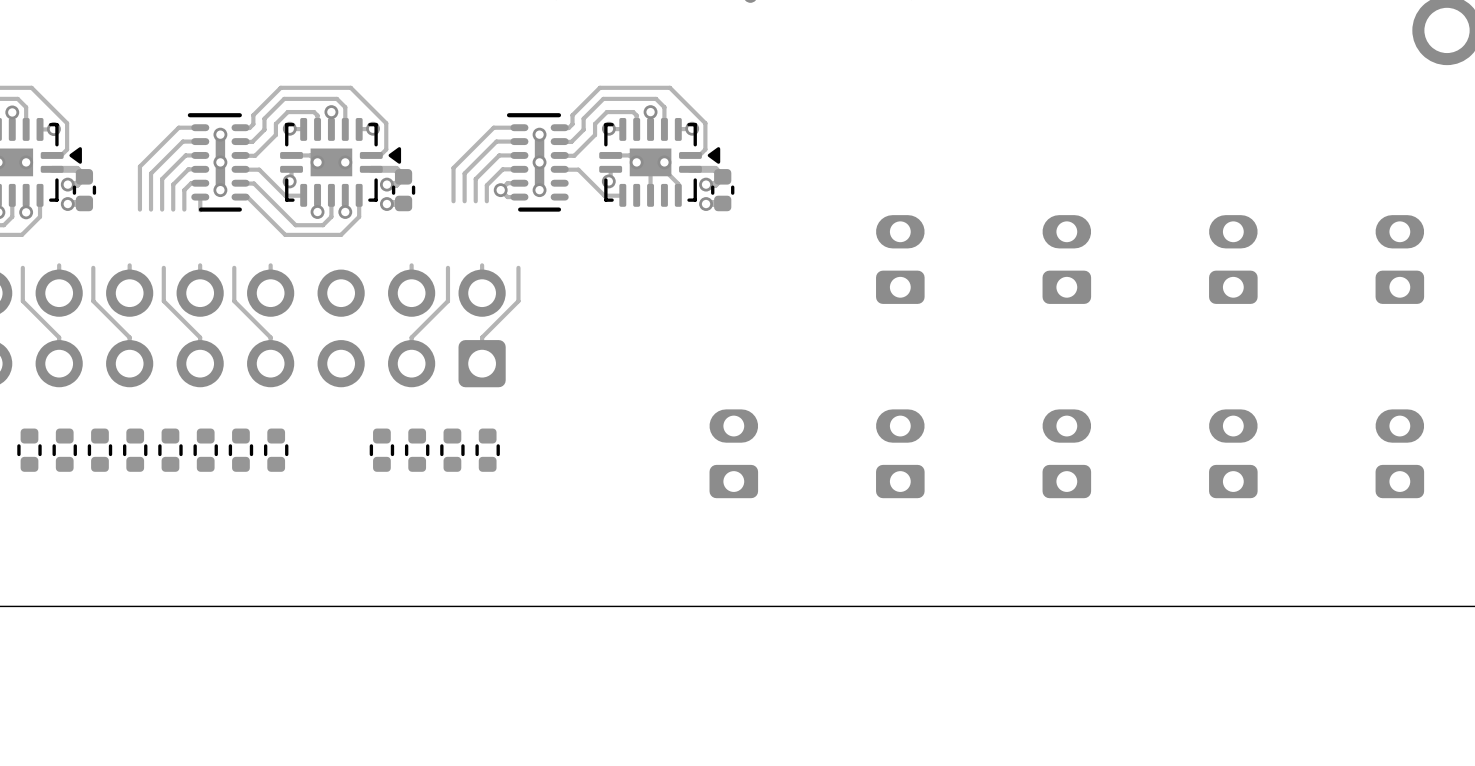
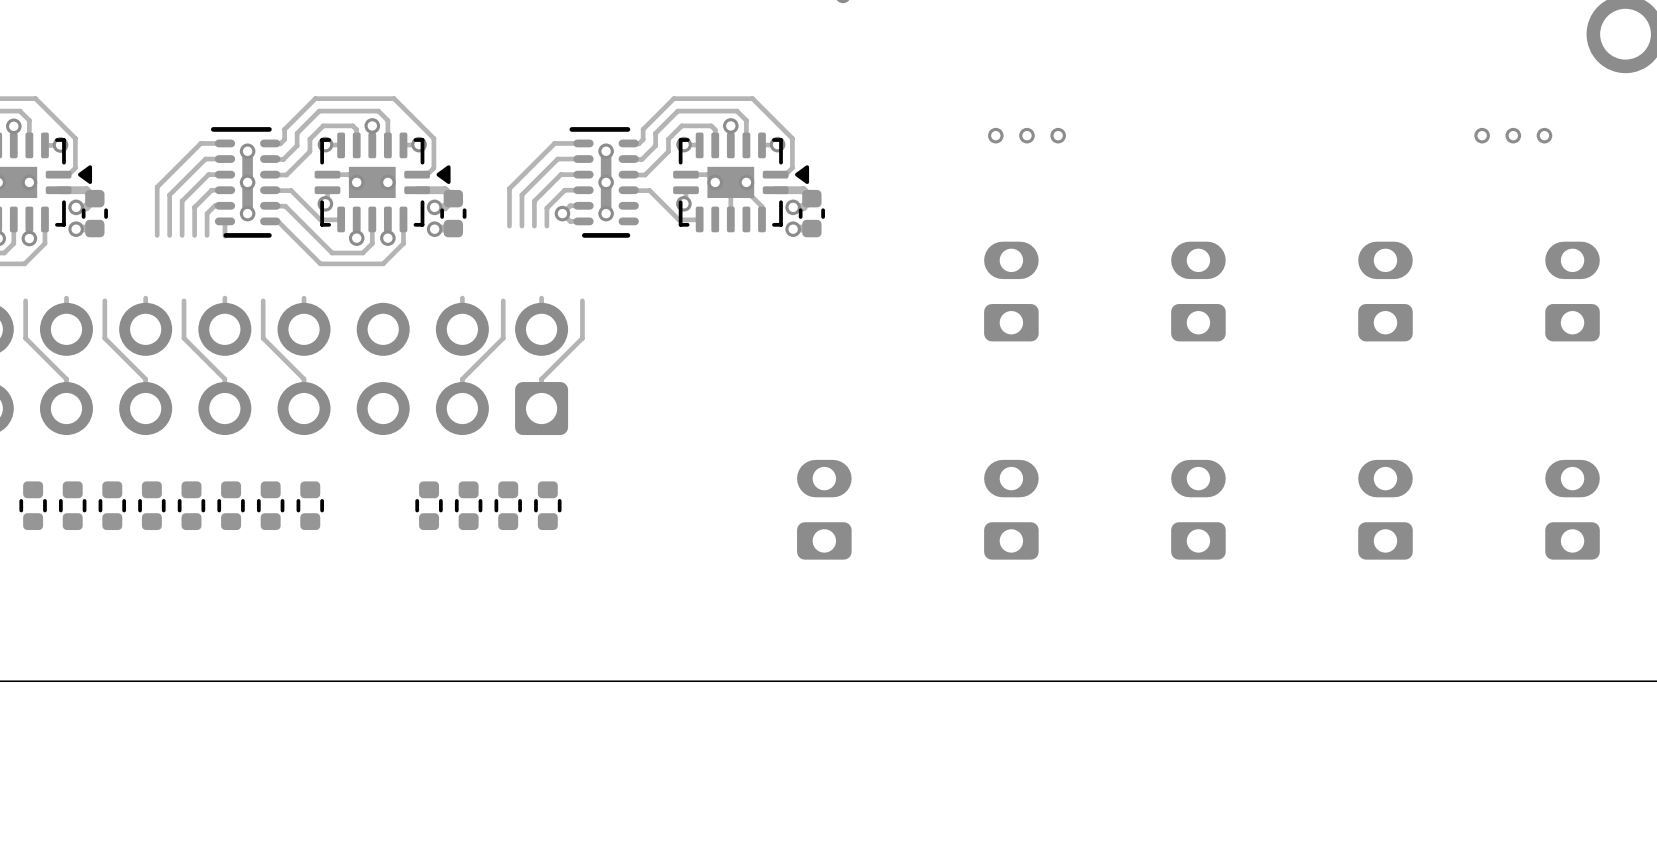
via: none -> (995, 135)
via: none -> (1026, 135)
via: none -> (1058, 135)
via: none -> (1482, 135)
via: none -> (1513, 135)
via: none -> (1544, 135)

